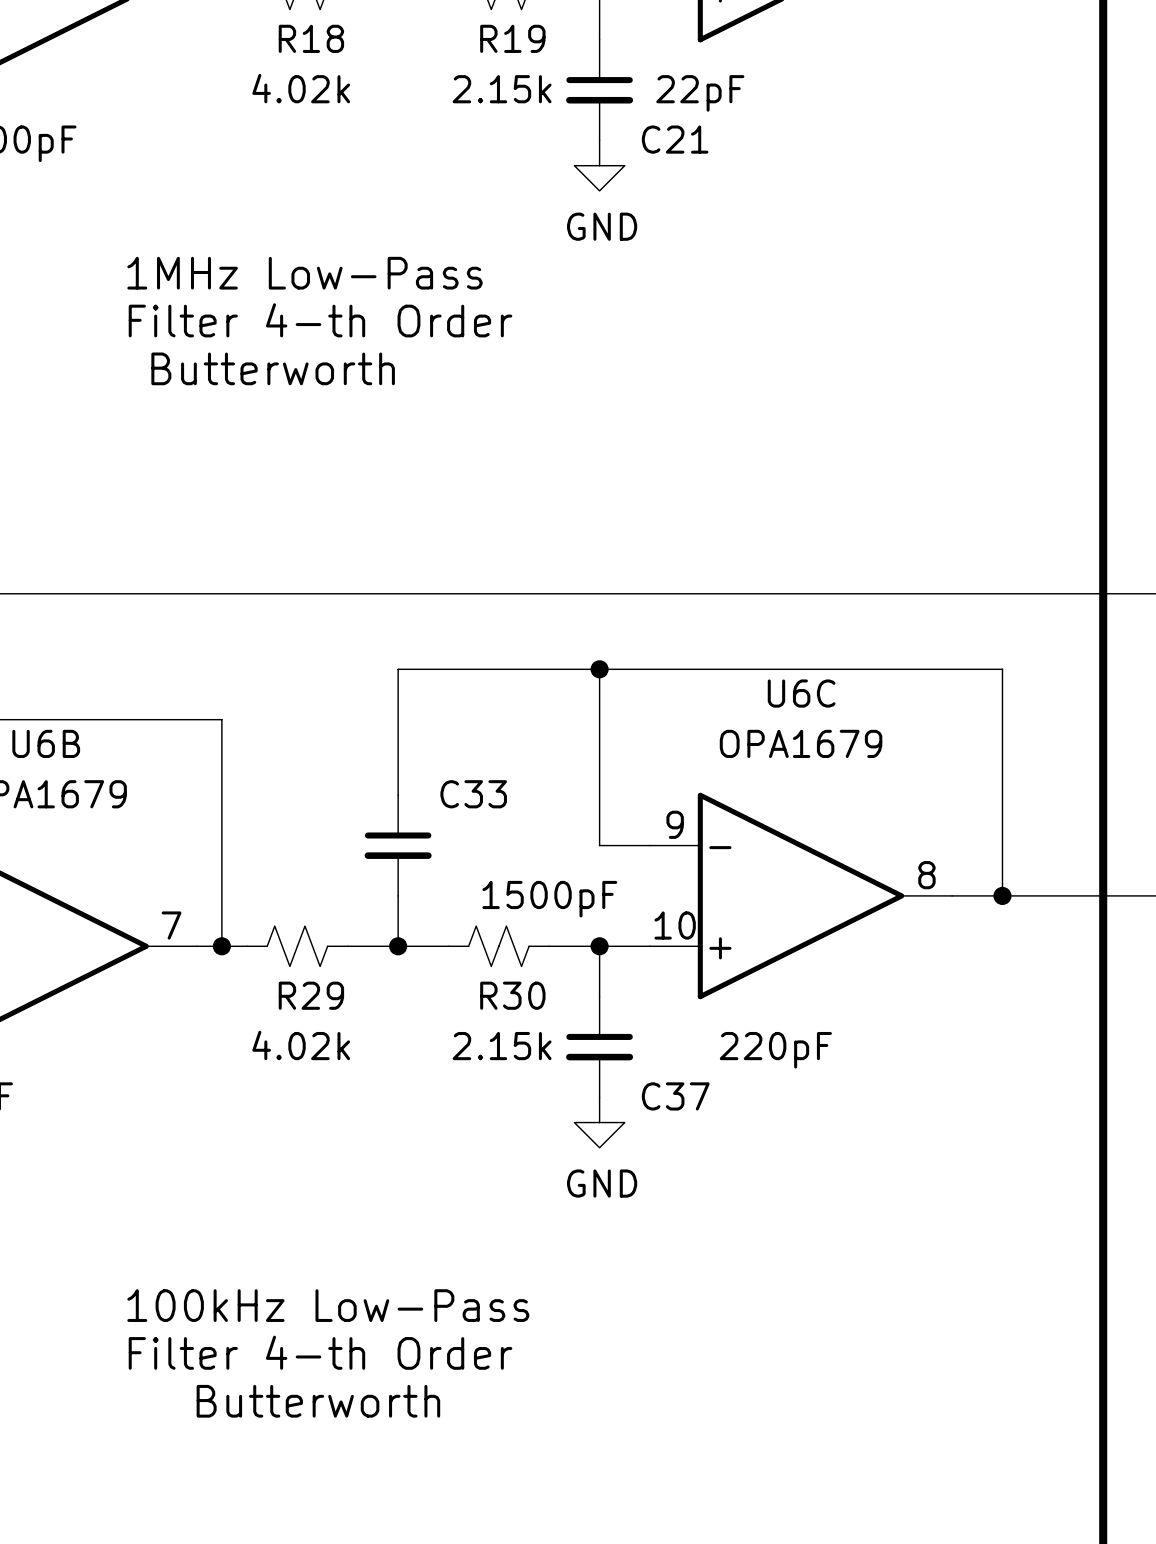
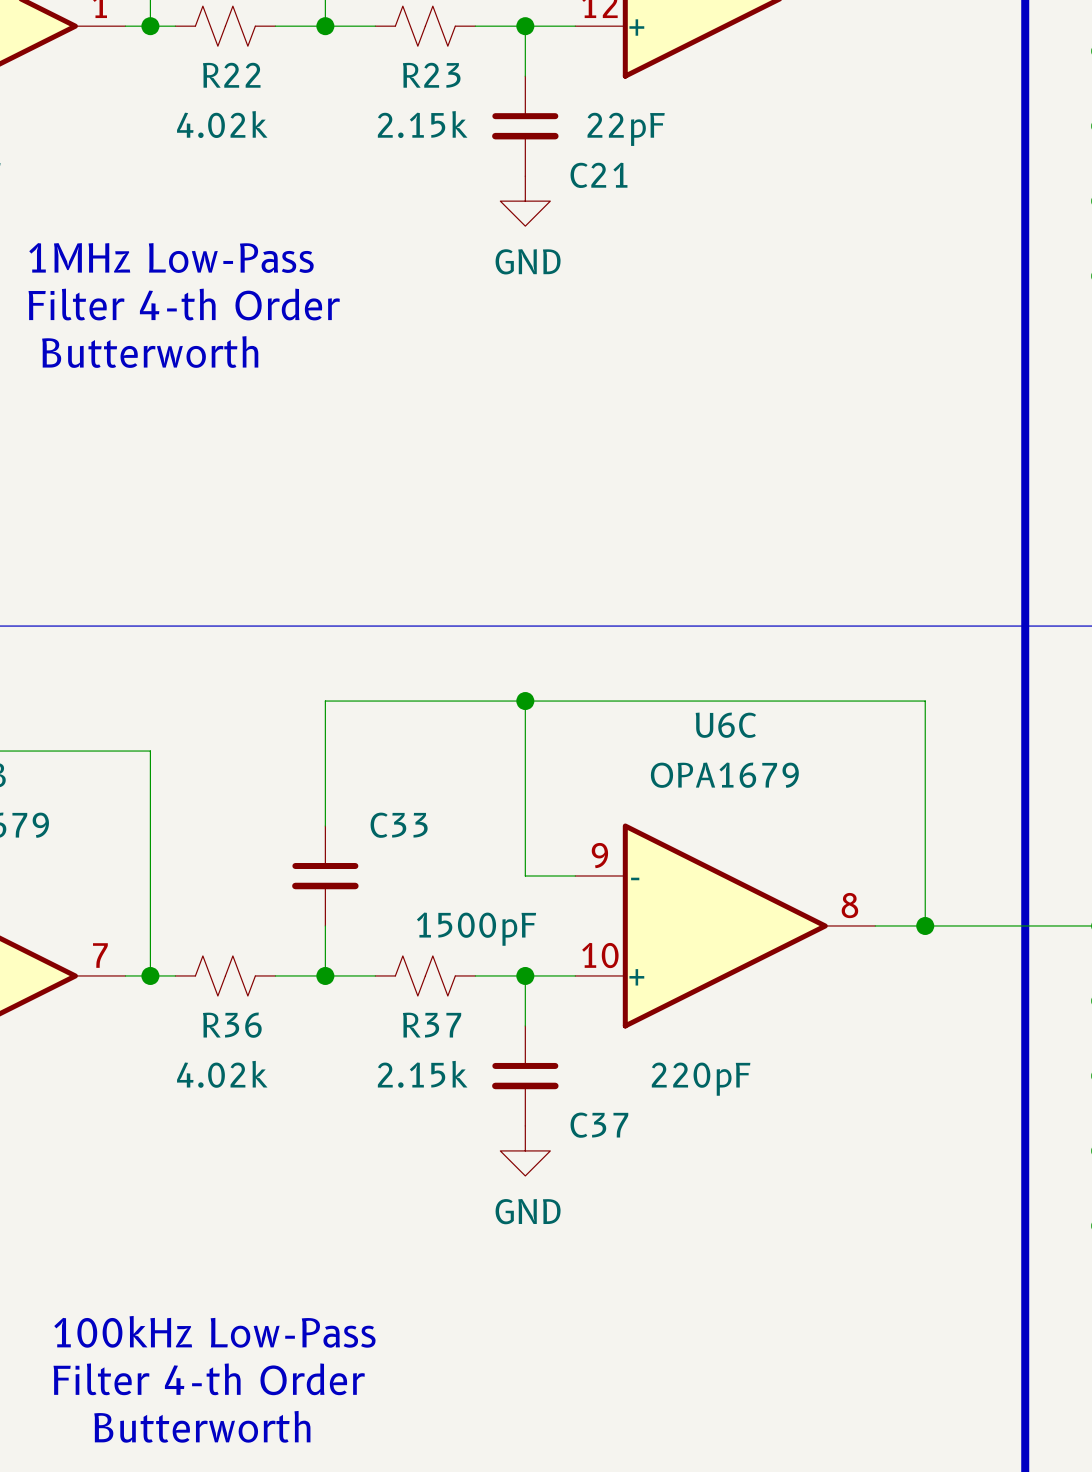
R18 name: R18 (311, 38) -> R22 (231, 75)
R19 name: R19 (512, 38) -> R23 (431, 75)
text position: 1MHz Low-Pass (304, 273) -> 1MHz Low-Pass (171, 258)
text position: Filter 4-th Order (320, 320) -> Filter 4-th Order (184, 304)
text position: Butterworth (273, 368) -> Butterworth (150, 352)
R29 name: R29 (311, 995) -> R36 (232, 1025)
R30 name: R30 (512, 995) -> R37 (432, 1025)

